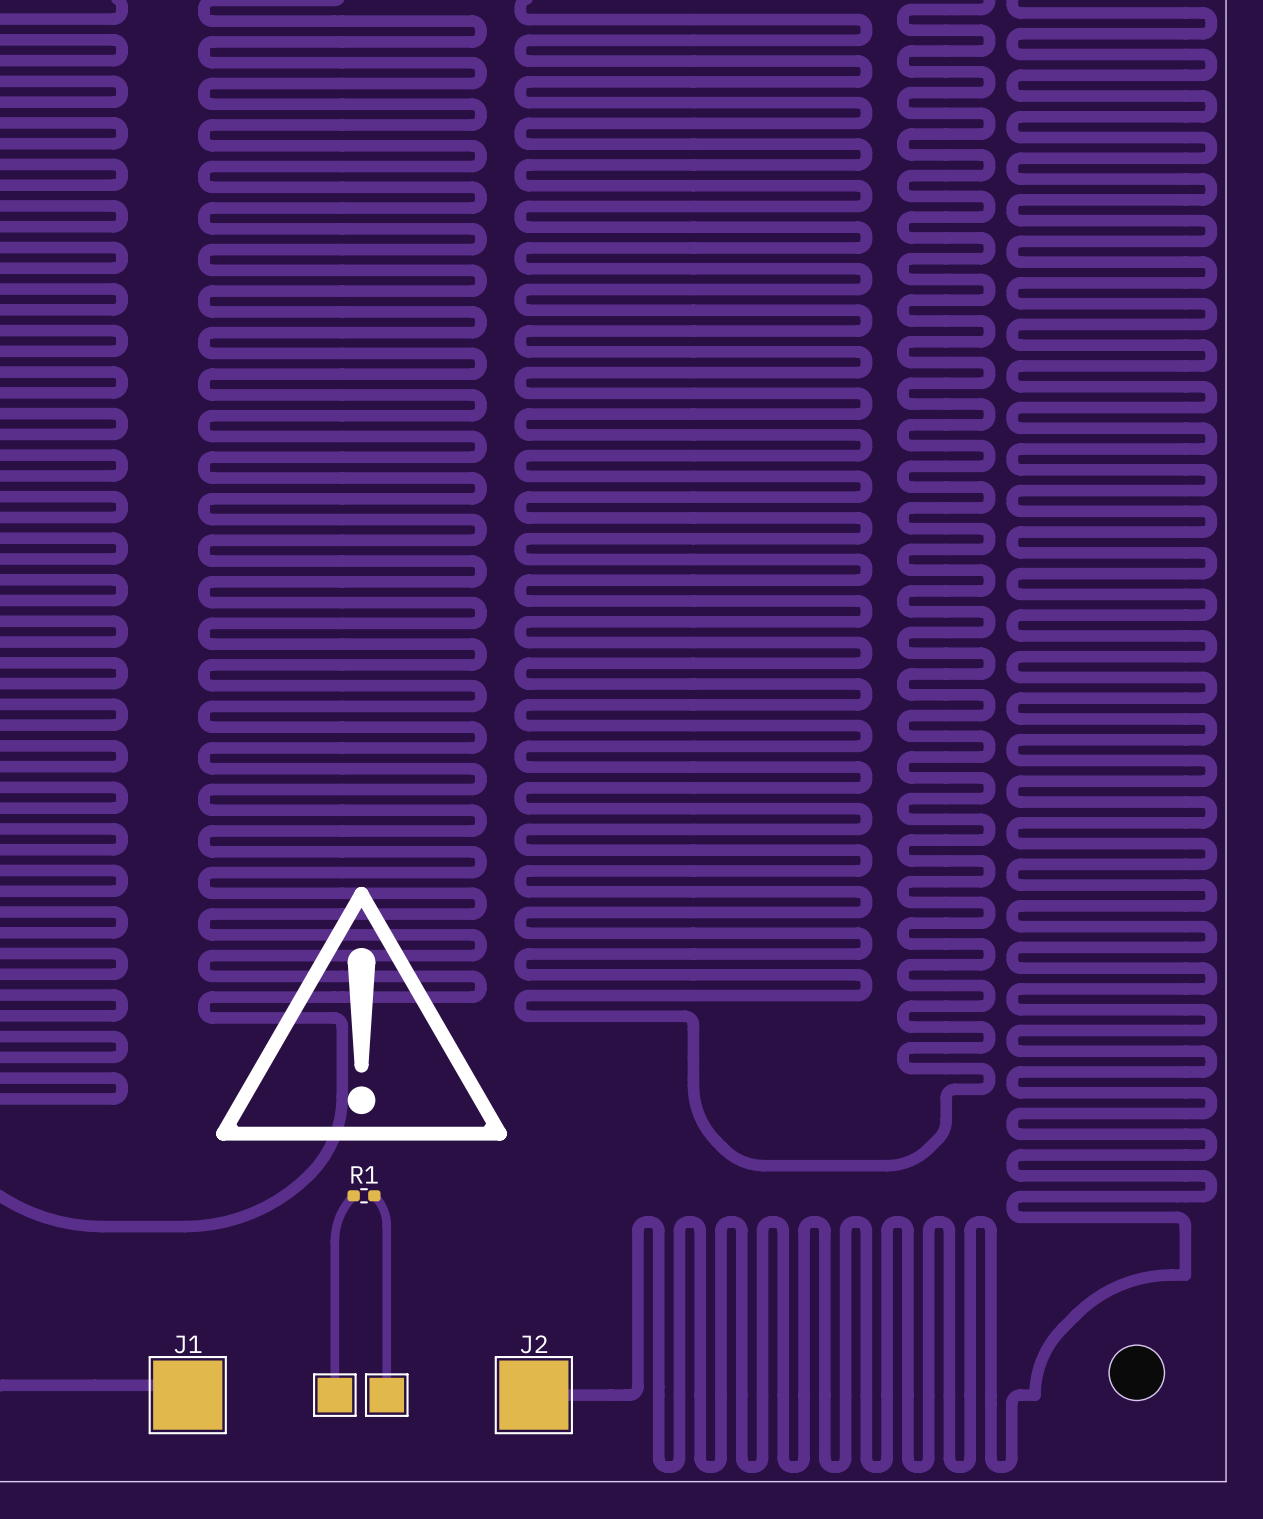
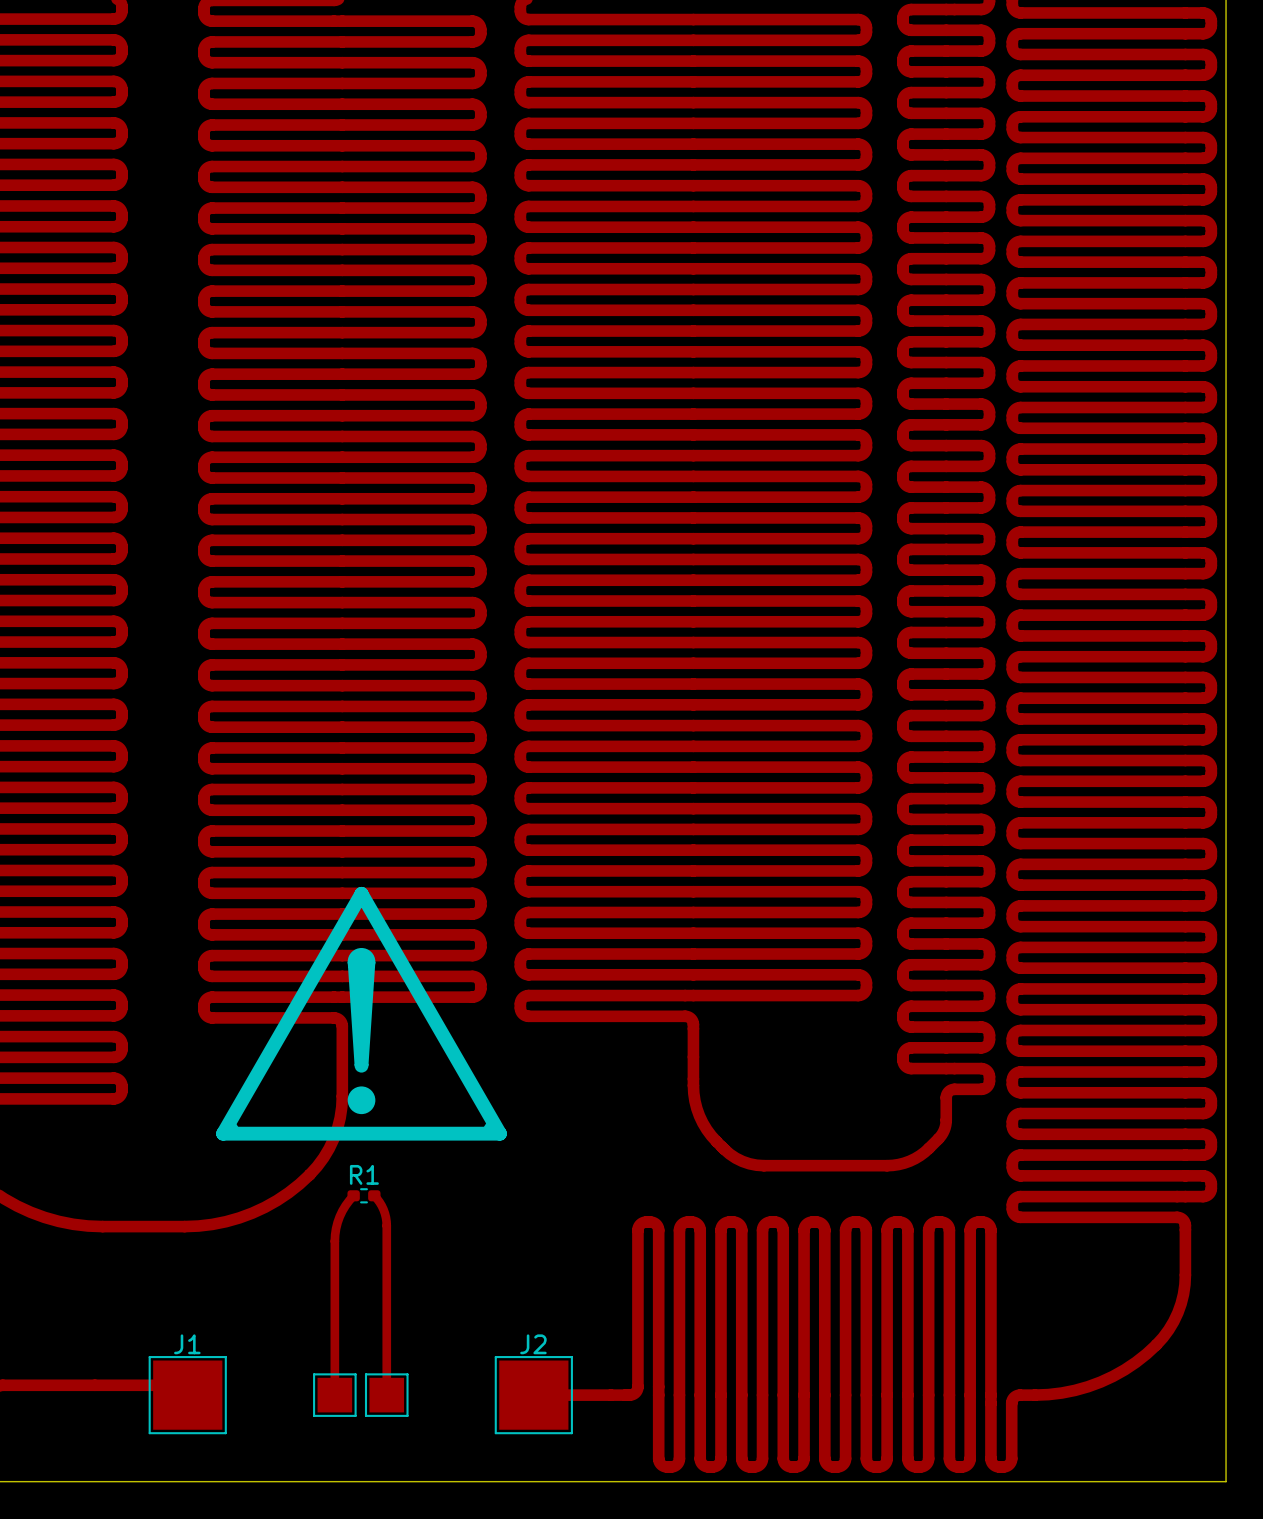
track: (1185, 1275) (1150, 1276) (1130, 1281) (1101, 1294) (1084, 1307) (1056, 1335) (1046, 1350) (1036, 1376) (1034, 1395) -> (1185, 1275) (1181, 1303) (1173, 1321) (1163, 1337) (1146, 1353) (1124, 1369) (1100, 1382) (1075, 1390) (1034, 1395)
part: (1136, 1372) -> none

